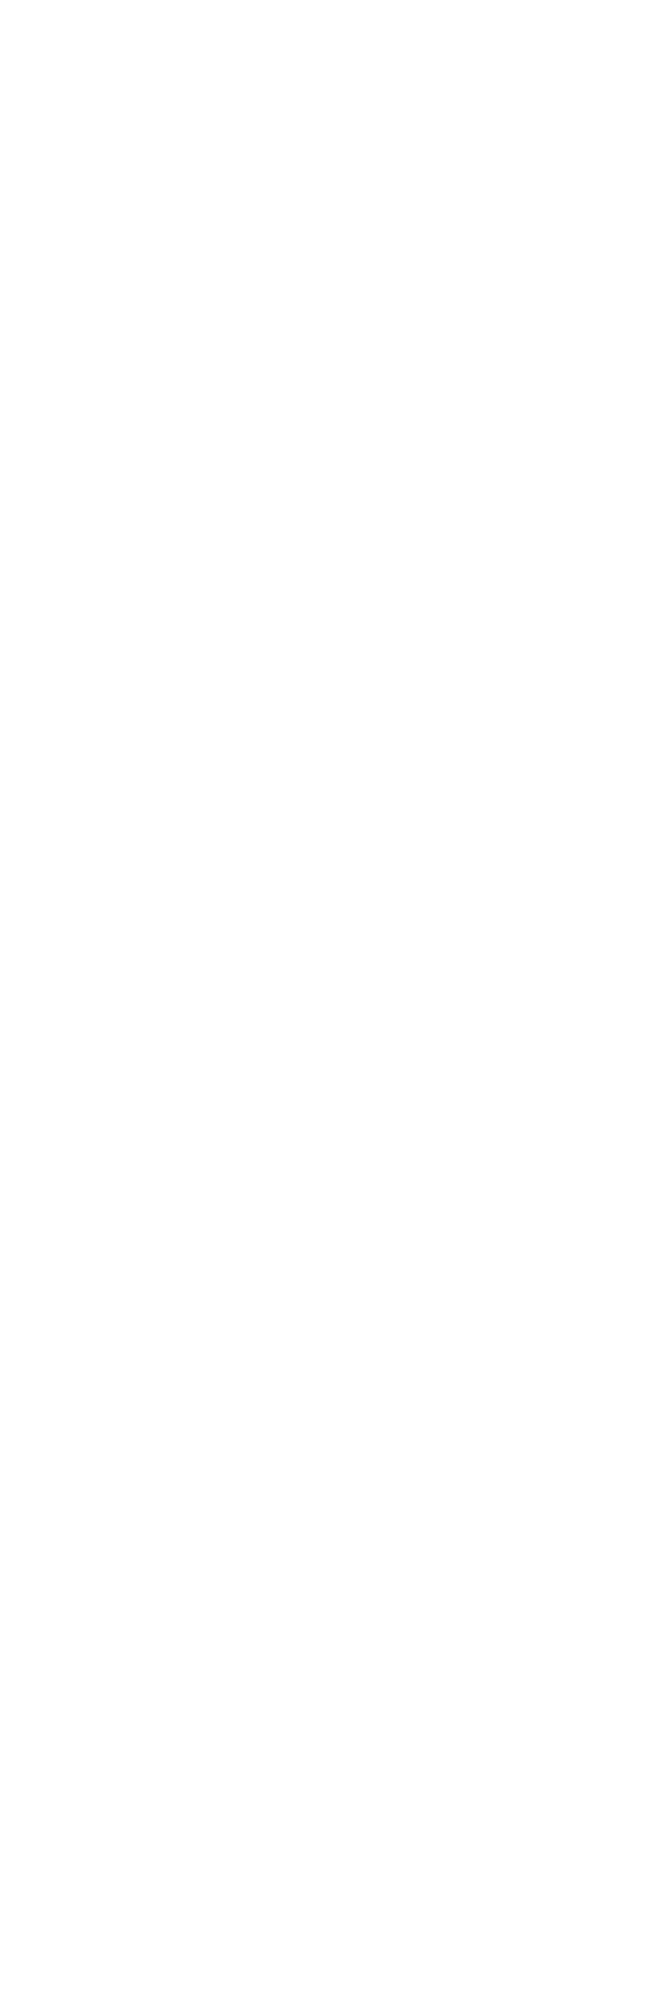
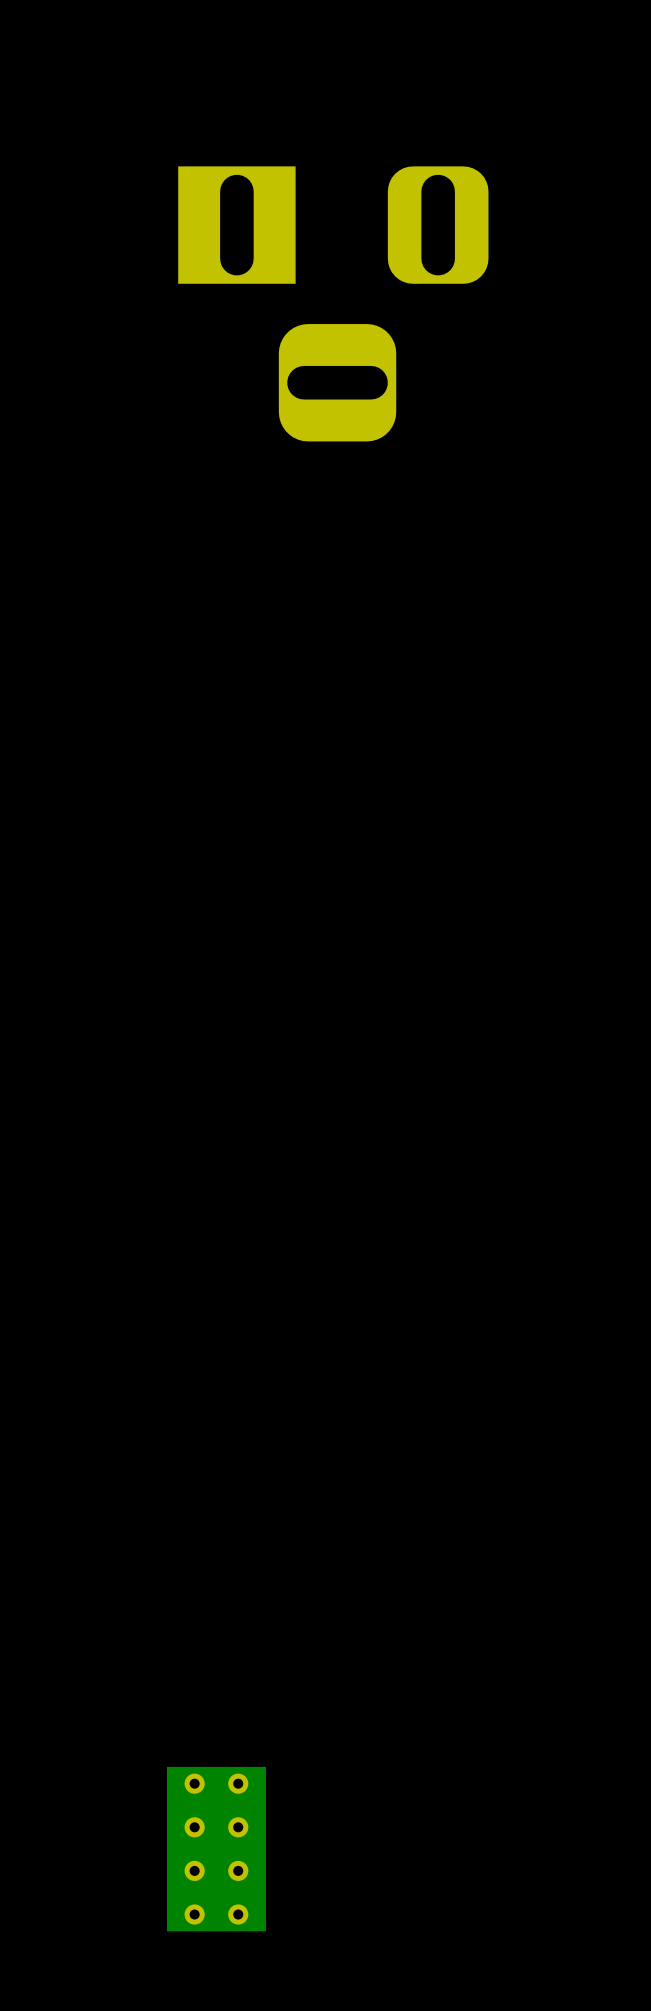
part: none -> (333, 303)
part: none -> (216, 1849)

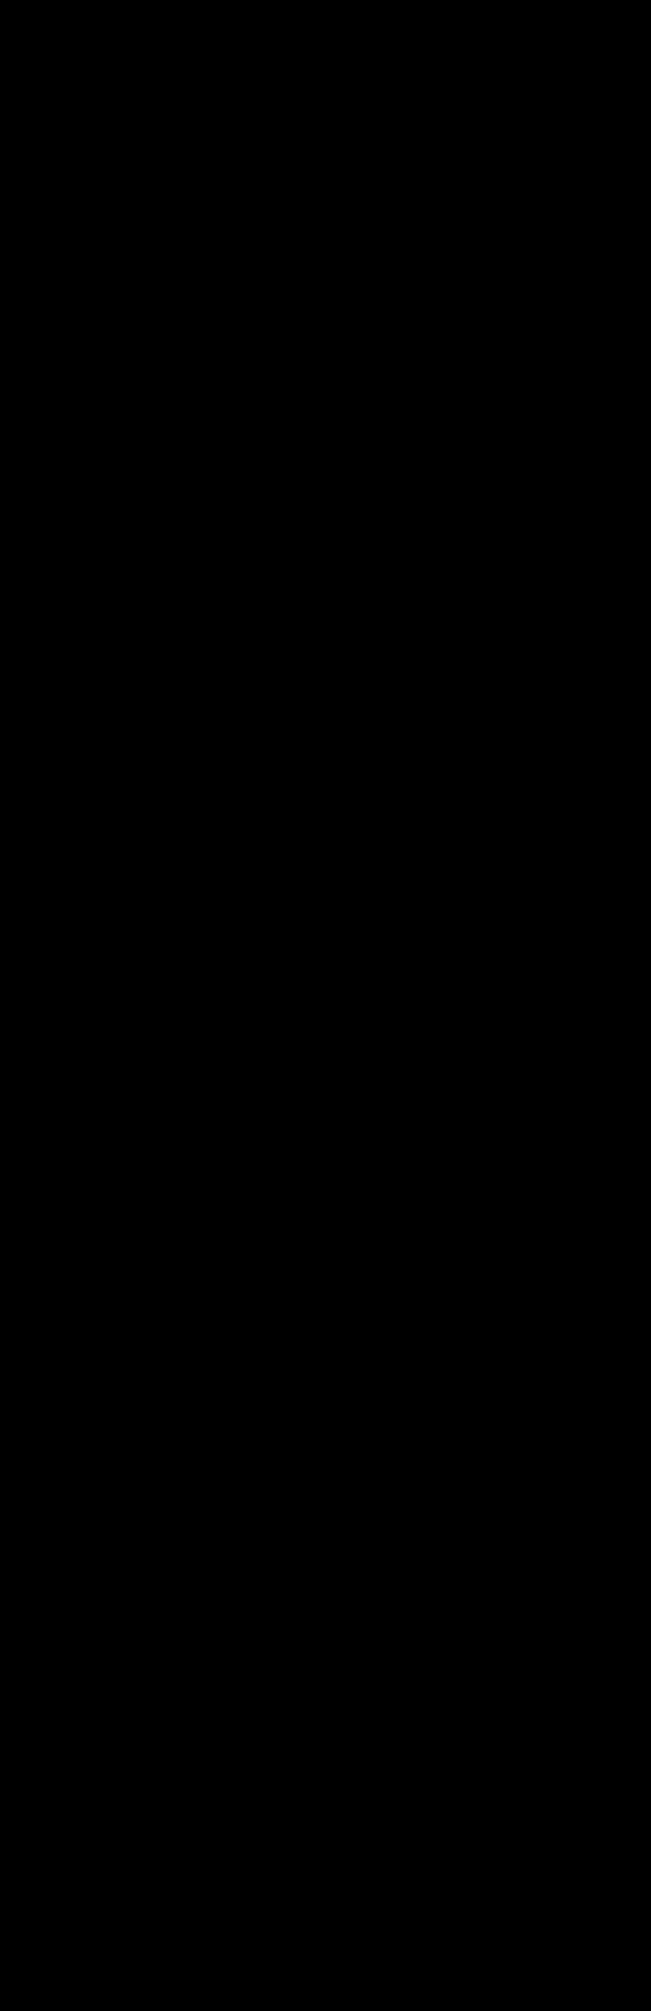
part: (333, 303) -> none
part: (216, 1849) -> none

